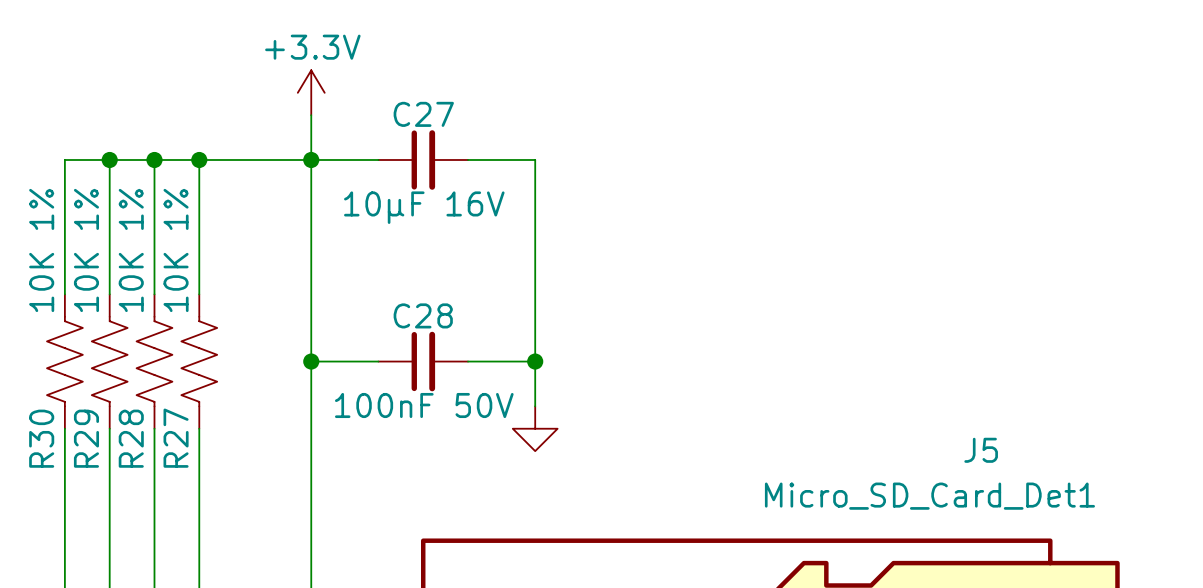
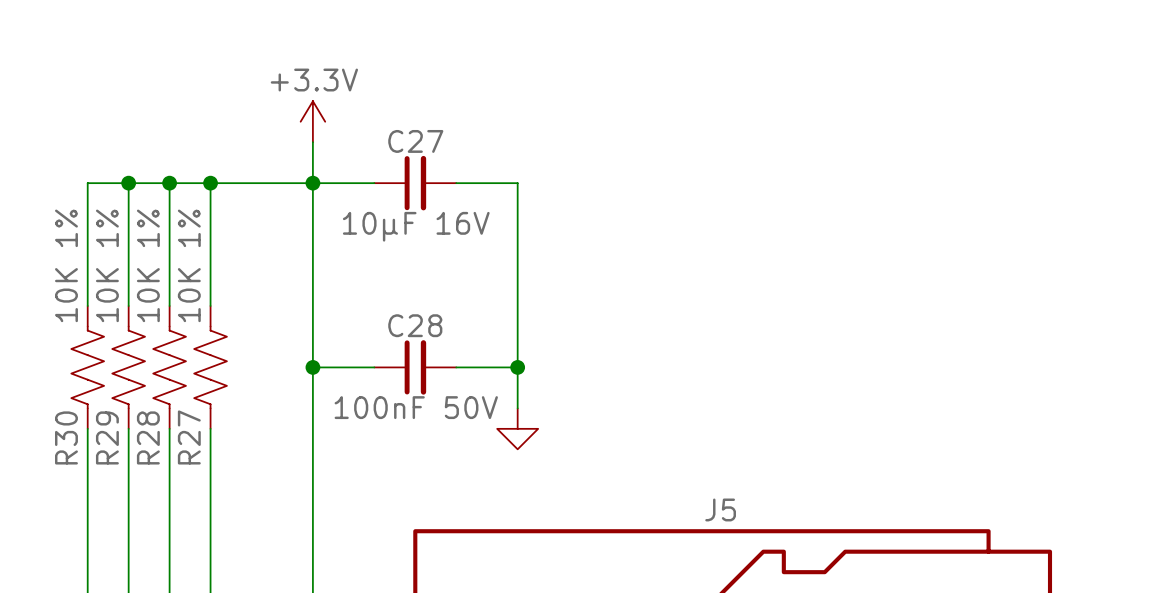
J5 name position: J5 (981, 450) -> J5 (720, 509)
J5 value: Micro_SD_Card_Det1 (929, 496) -> none

